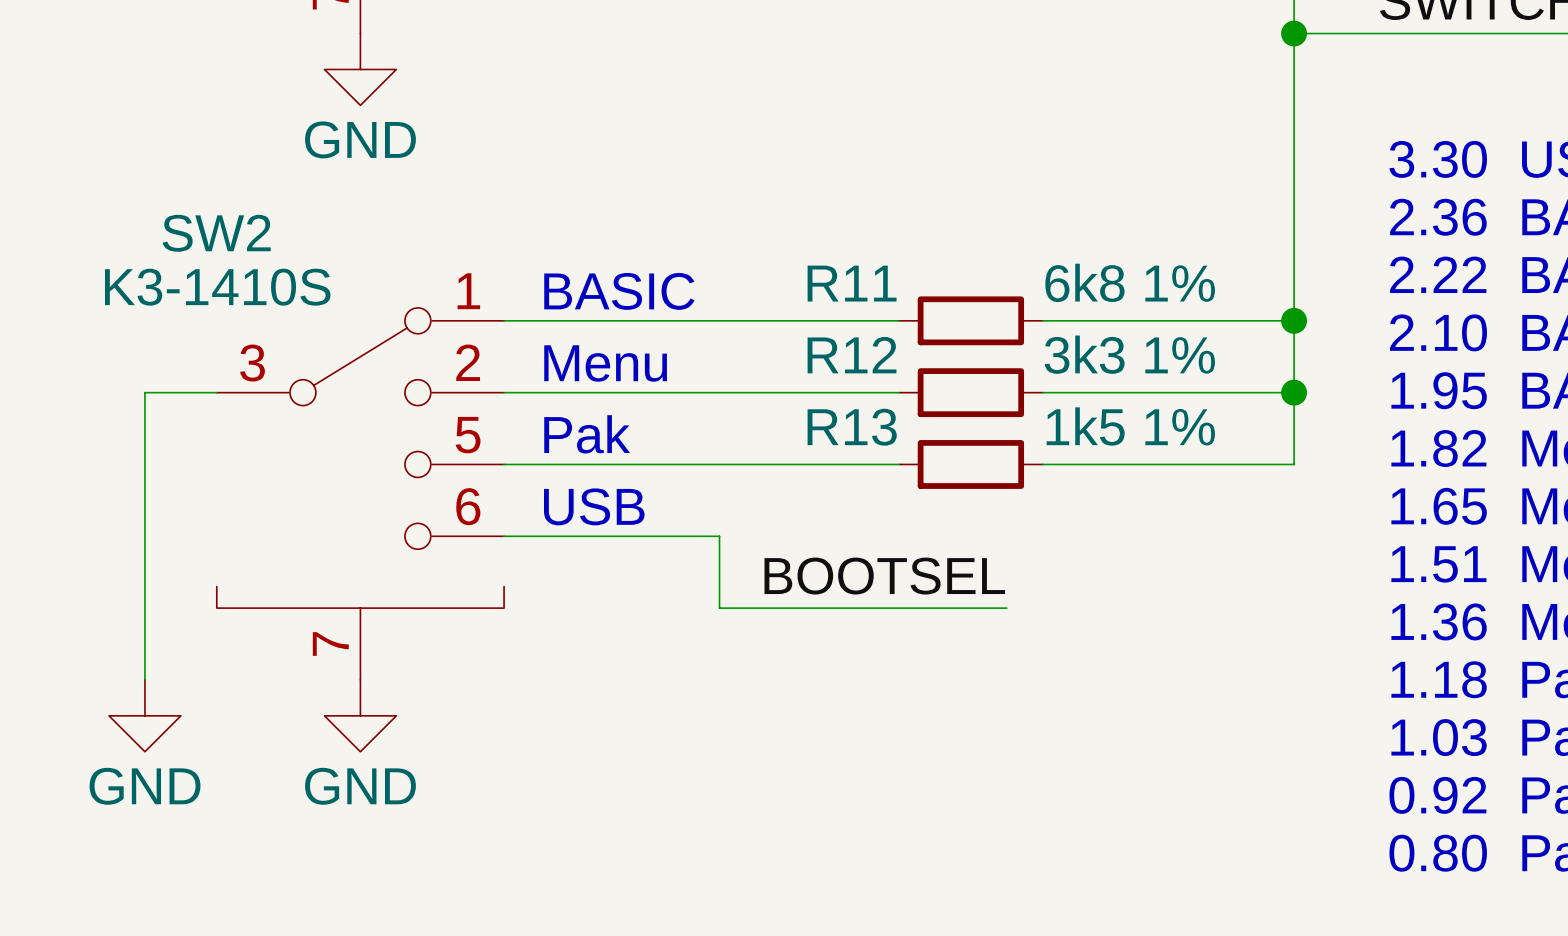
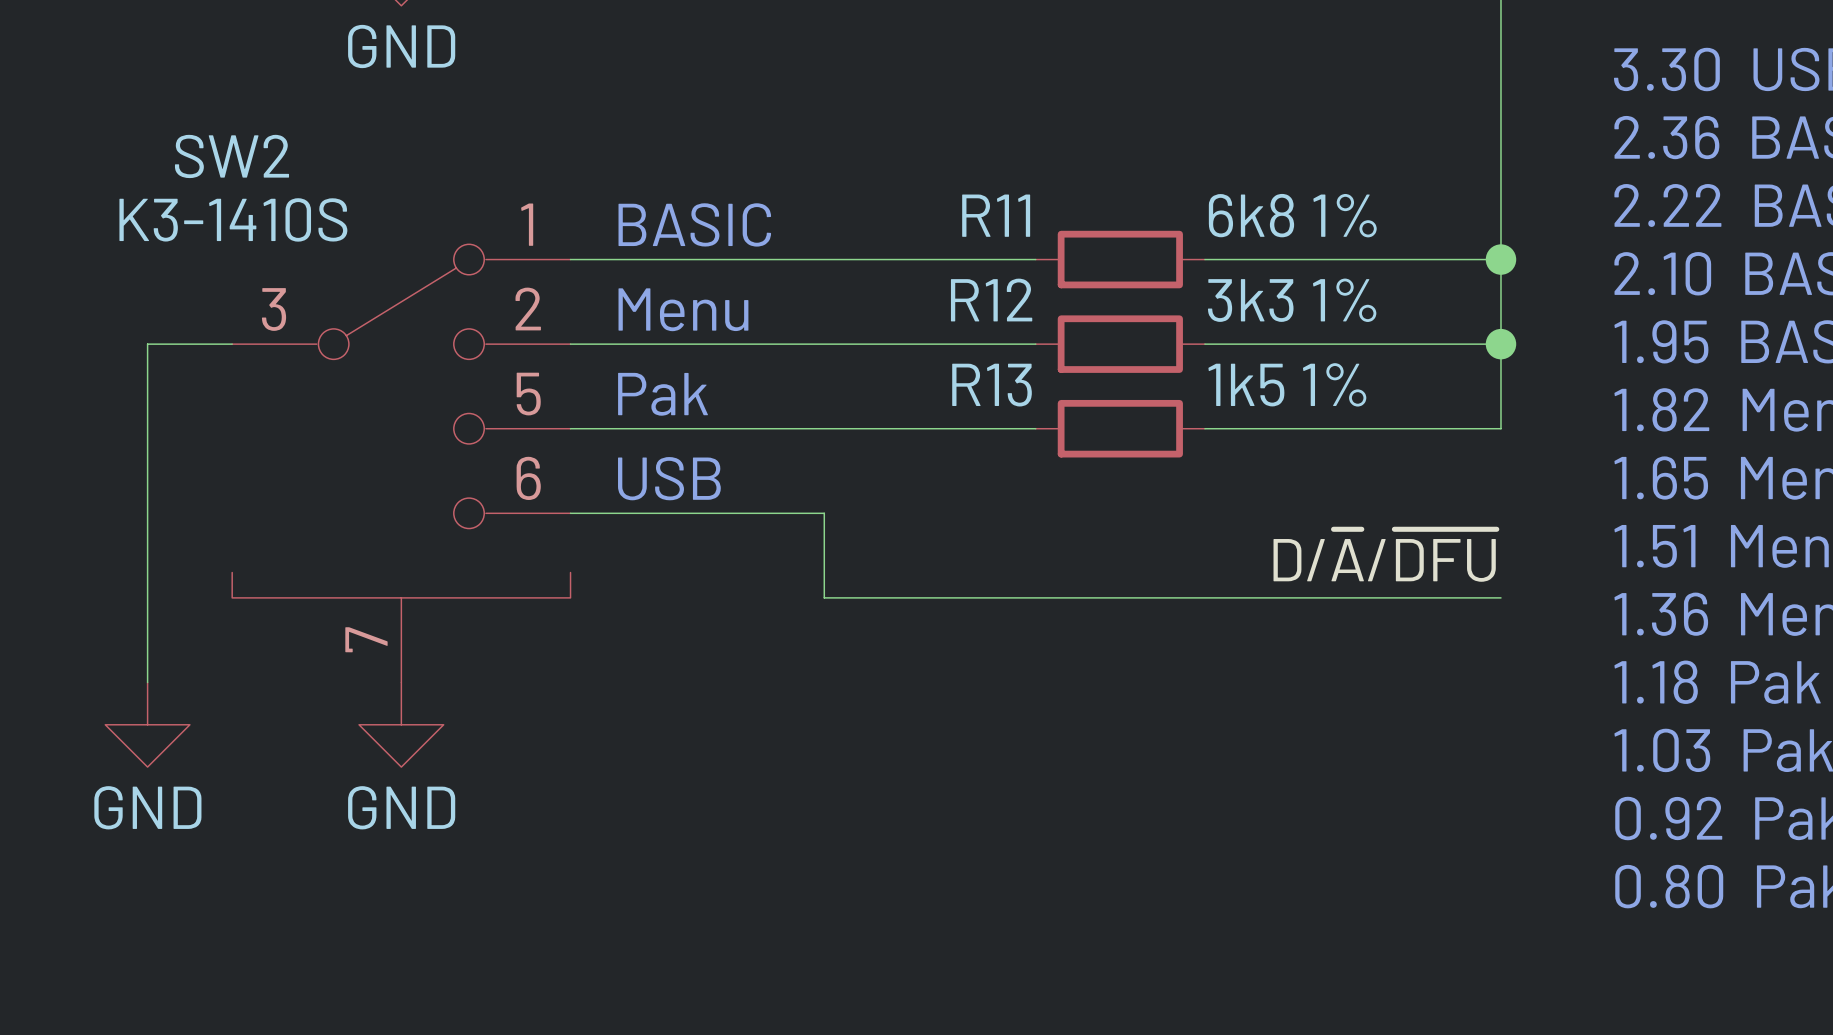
label: none -> D/~{A}/~{DFU} (1385, 555)
label: BOOTSEL (884, 576) -> none
wire: none -> (1162, 597) (1500, 597)

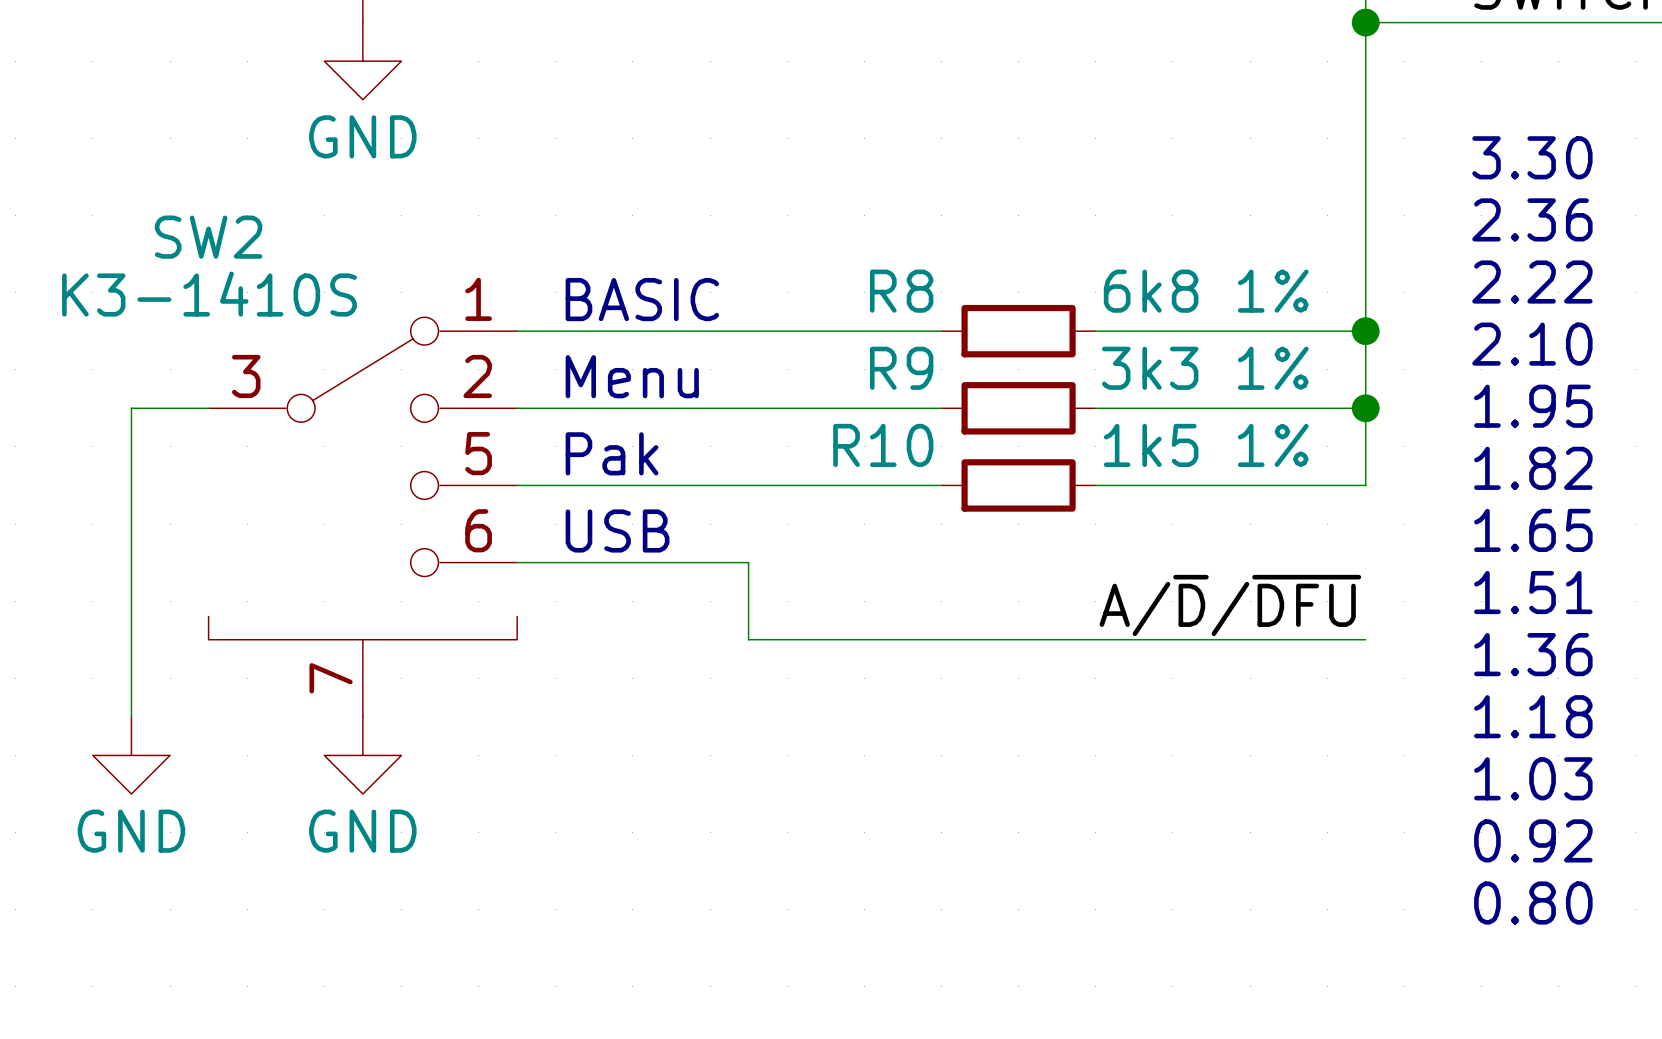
R11 name: R11 (996, 215) -> R8 (901, 291)
R12 name: R12 (991, 300) -> R9 (901, 368)
R13 name: R13 (992, 385) -> R10 (883, 445)
label: D/~{A}/~{DFU} (1385, 555) -> A/~{D}/~{DFU} (1230, 605)

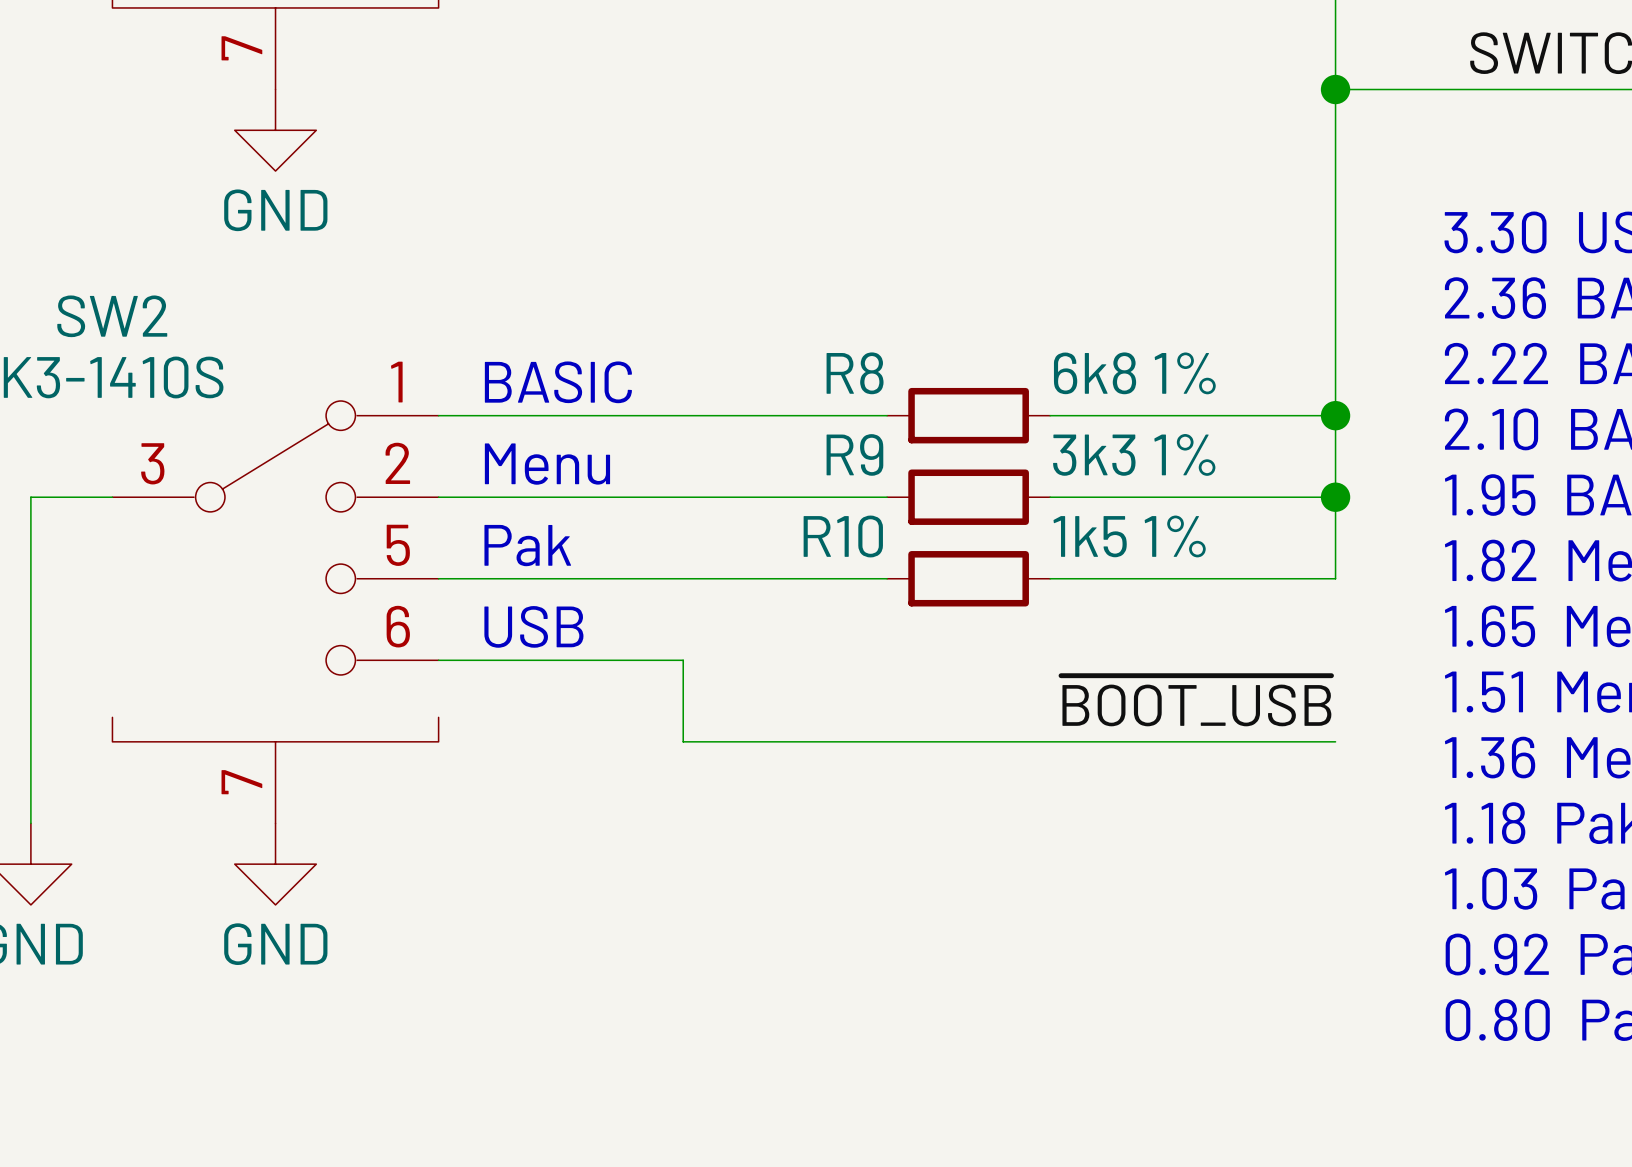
label: A/~{D}/~{DFU} (1230, 605) -> ~{BOOT_USB} (1196, 701)

